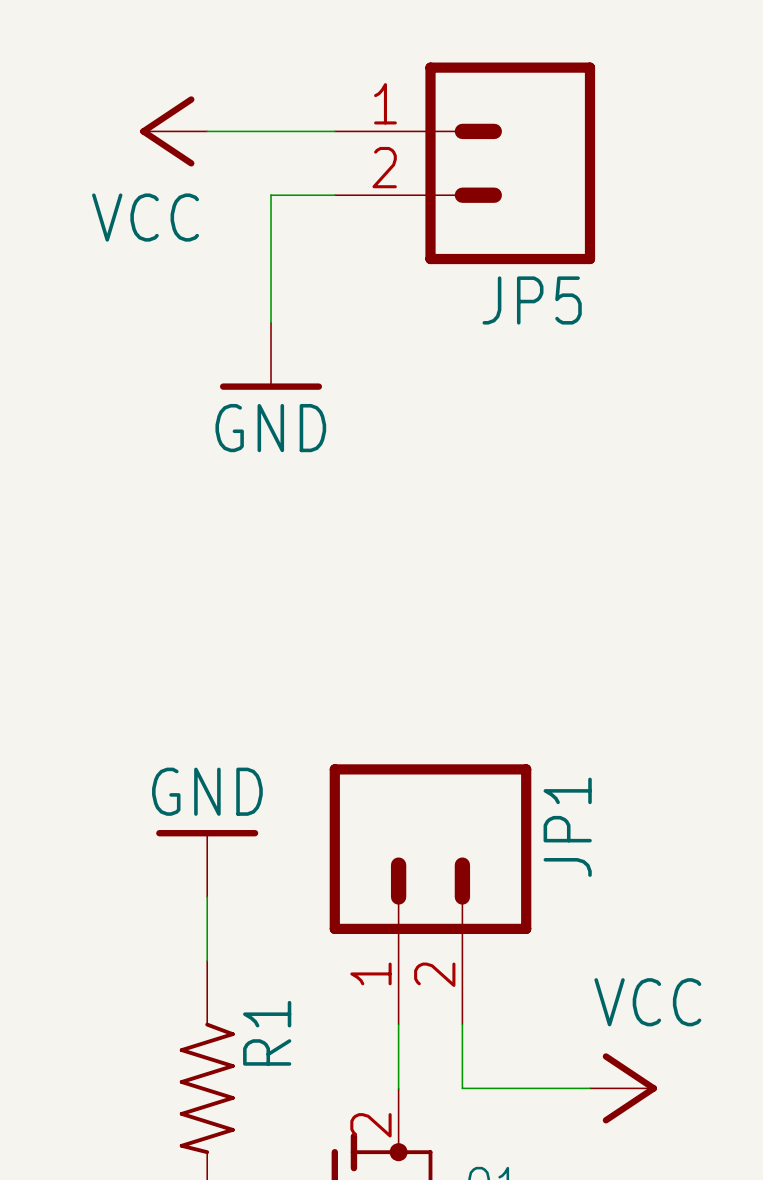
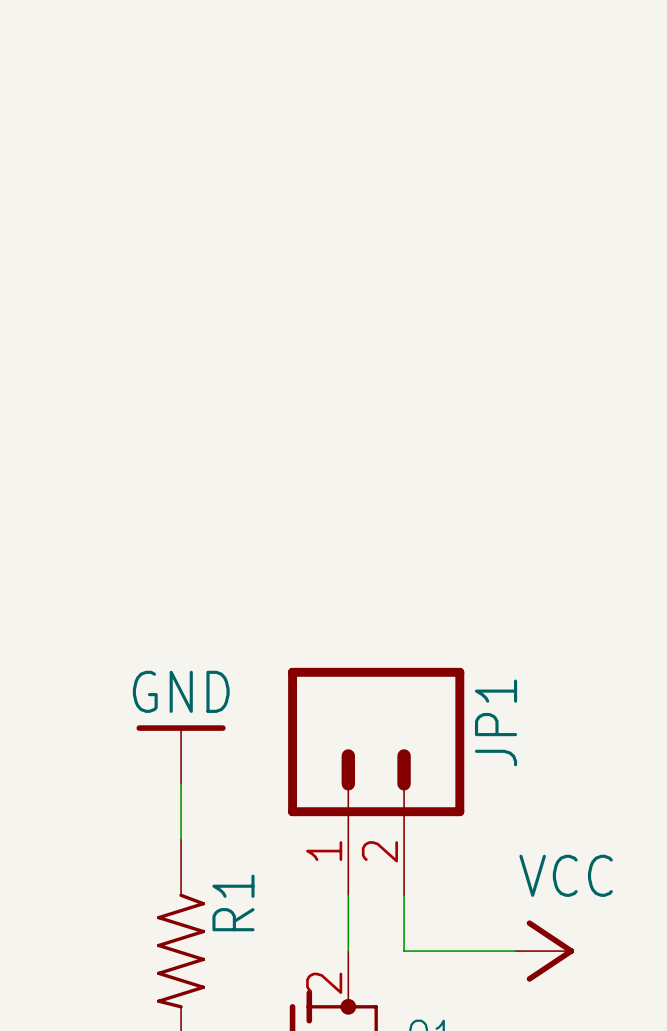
power symbol: VCC (173, 131) -> none
wire: (207, 131) (334, 131) -> none
JP5: (464, 163) -> none
wire: (334, 195) (271, 195) (271, 322) -> none
power symbol: GND (271, 356) -> none

